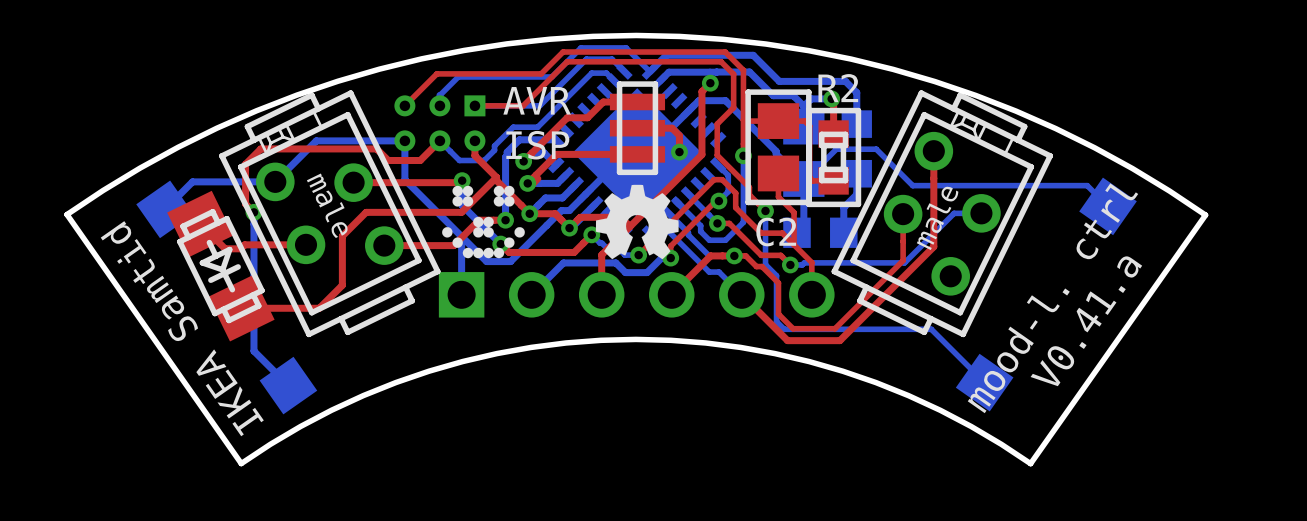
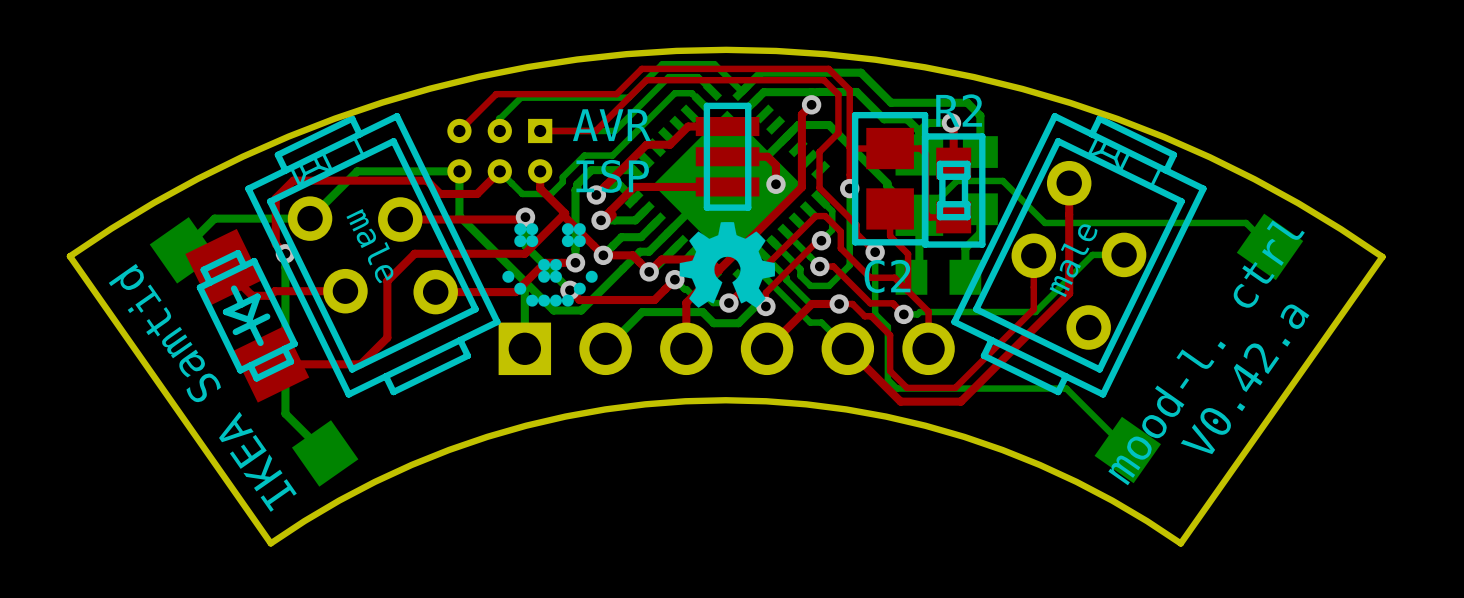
text: V0.41.a (1086, 321) -> V0.42.a (1245, 379)

